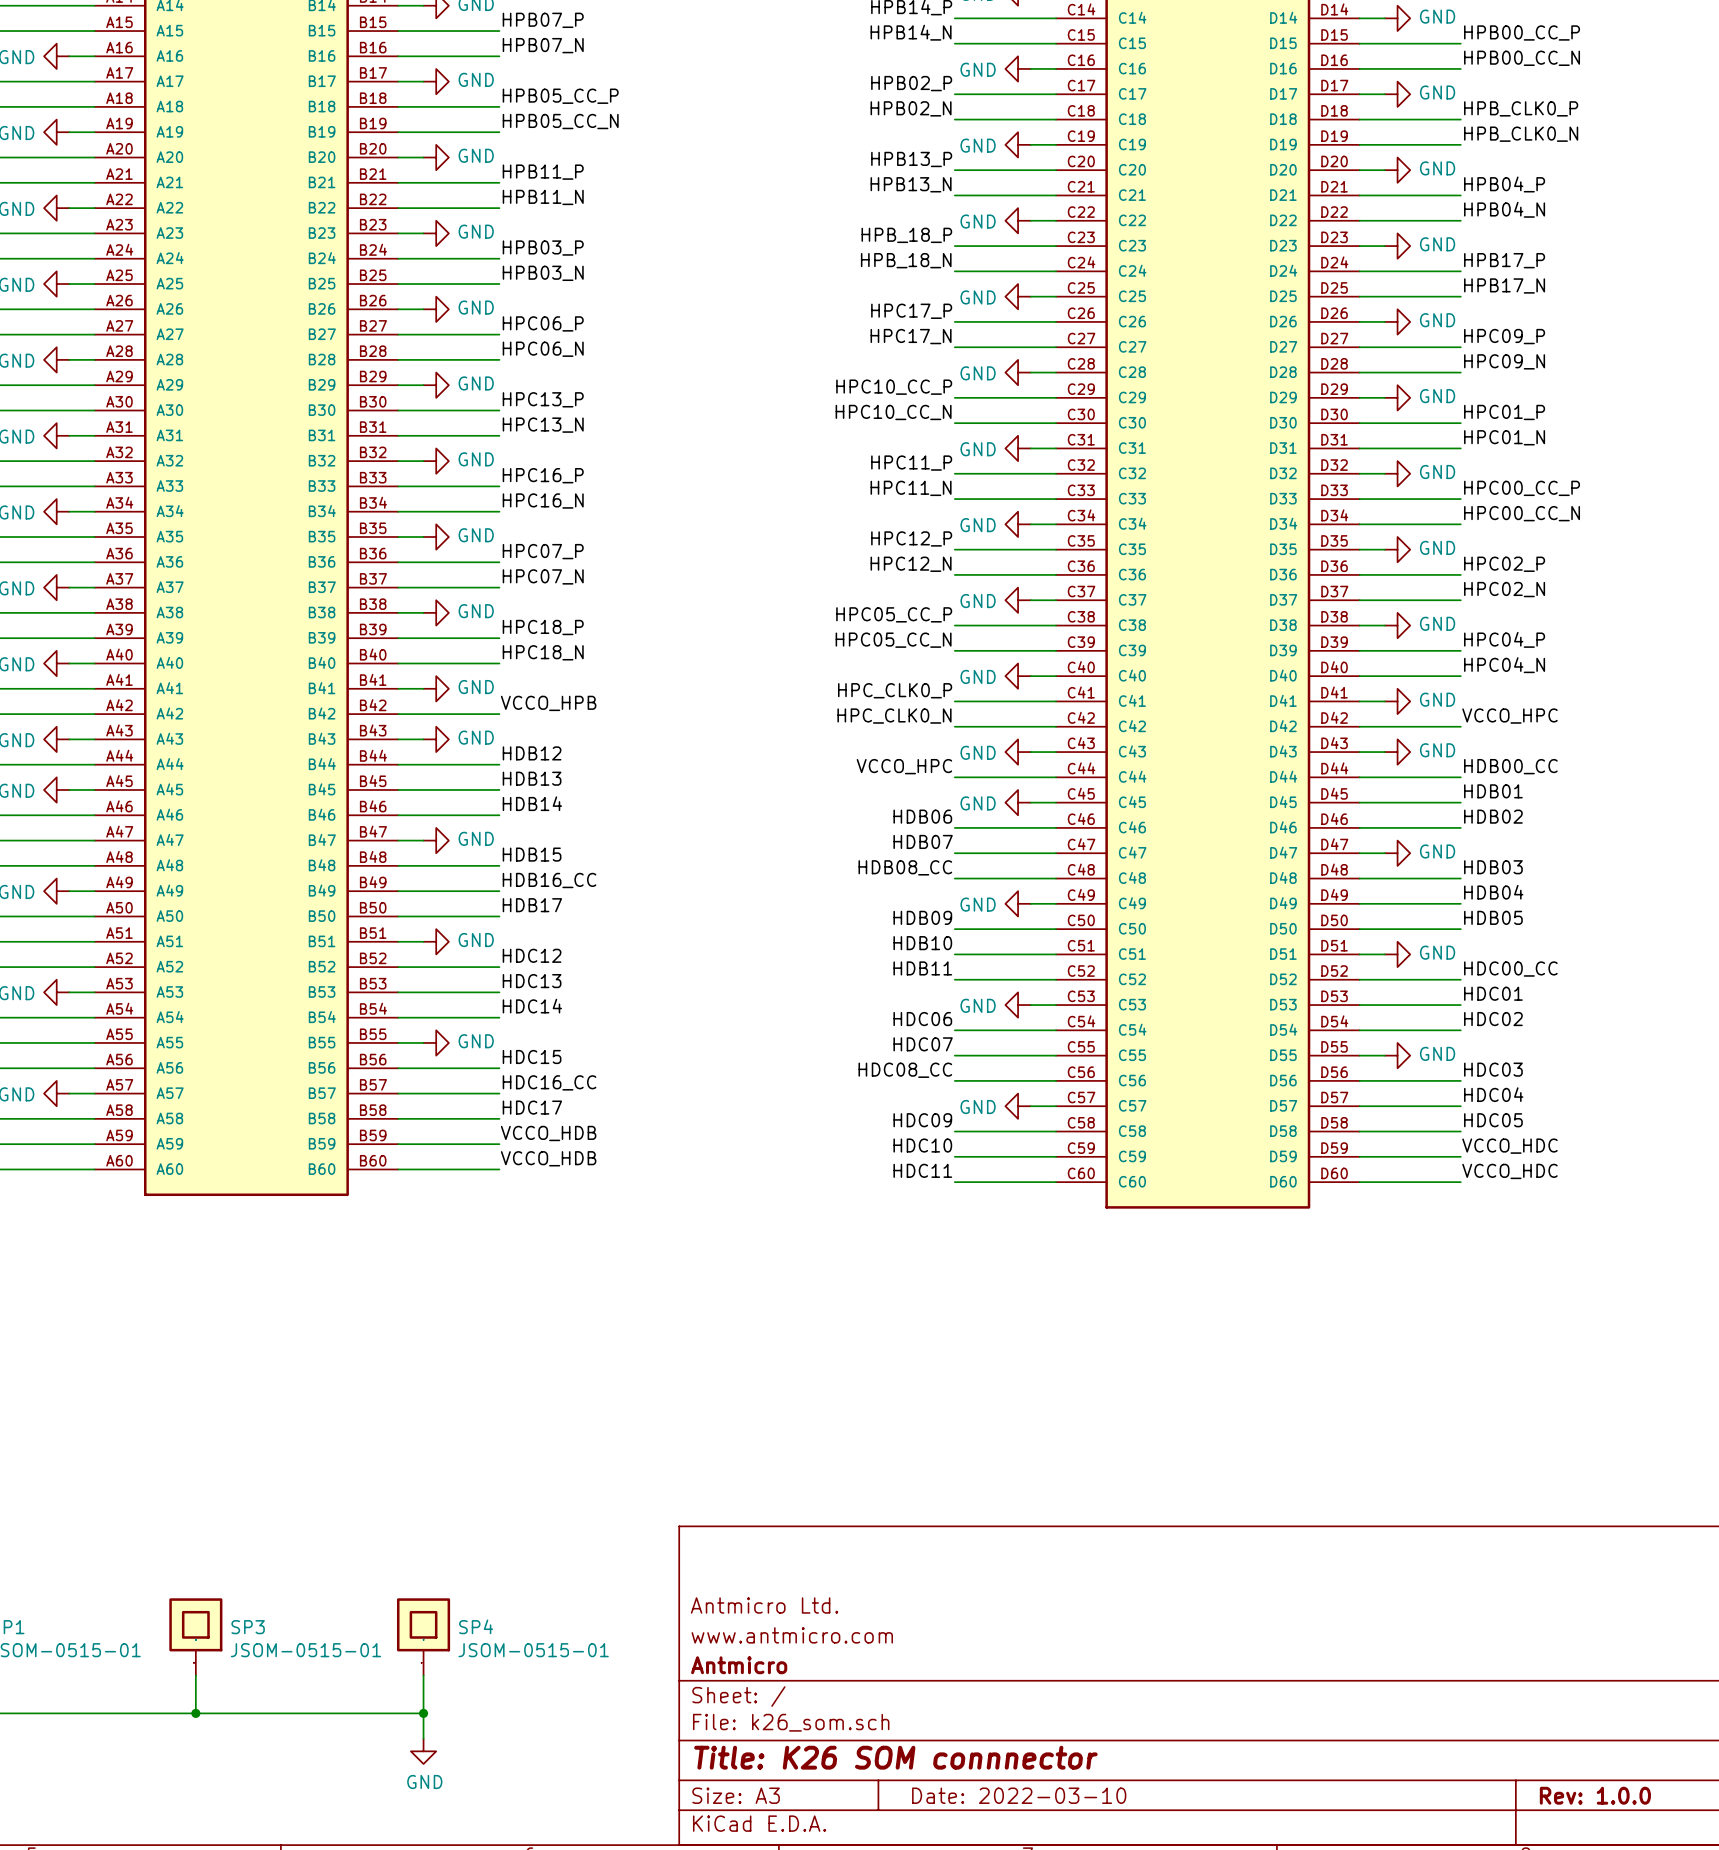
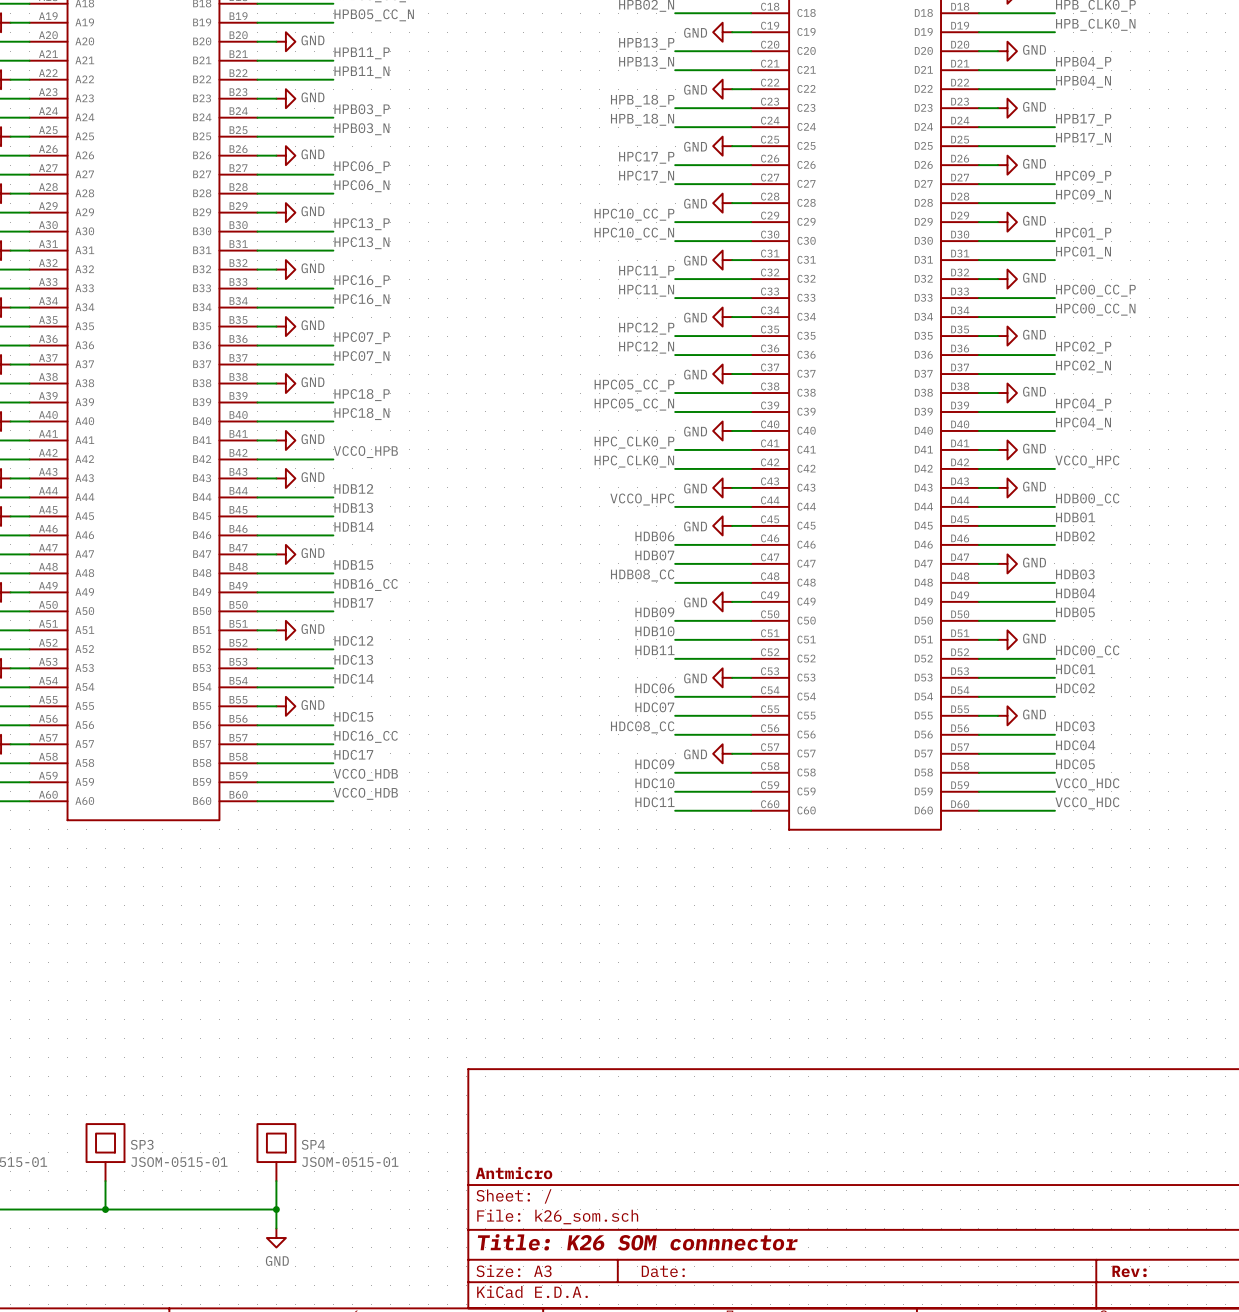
title block: Antmicro Ltd. (764, 1605) -> none
title block: www.antmicro.com (792, 1635) -> none
title block: Date: 2022-03-10 (1019, 1795) -> Date: (663, 1271)
title block: Rev: 1.0.0 (1595, 1795) -> Rev: (1129, 1271)

